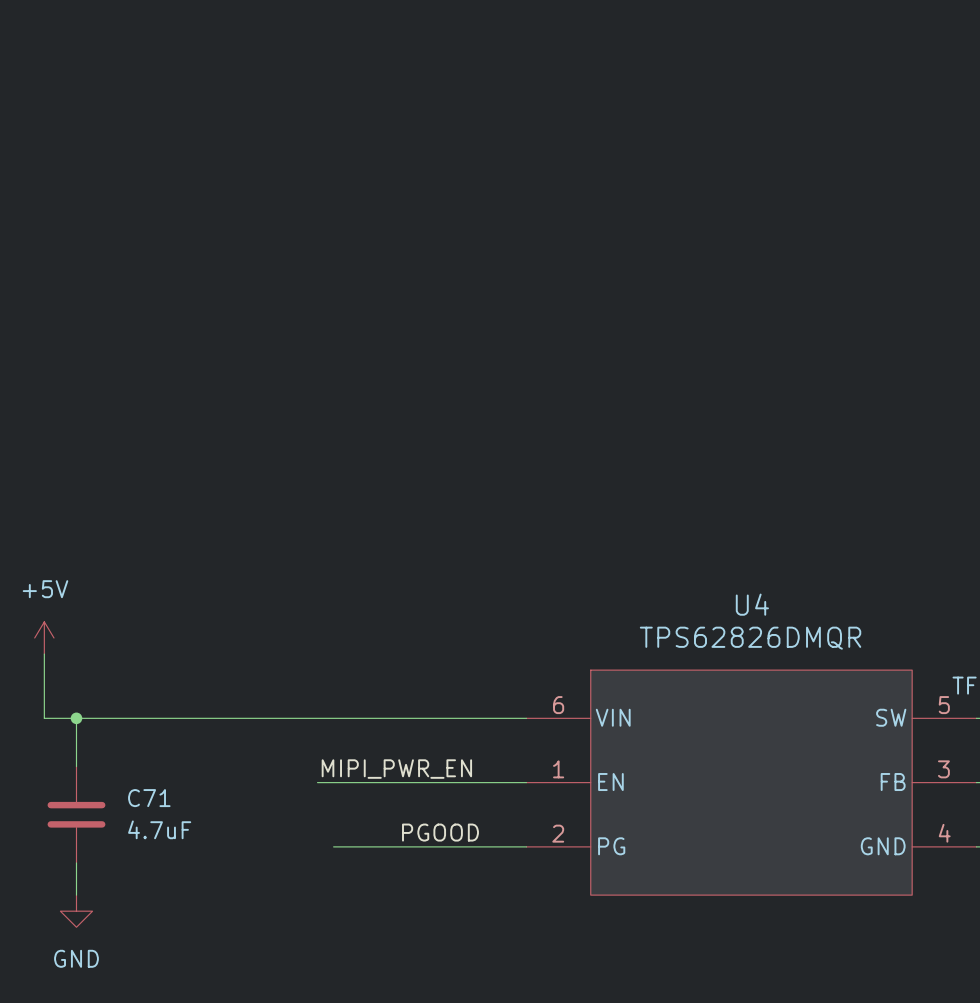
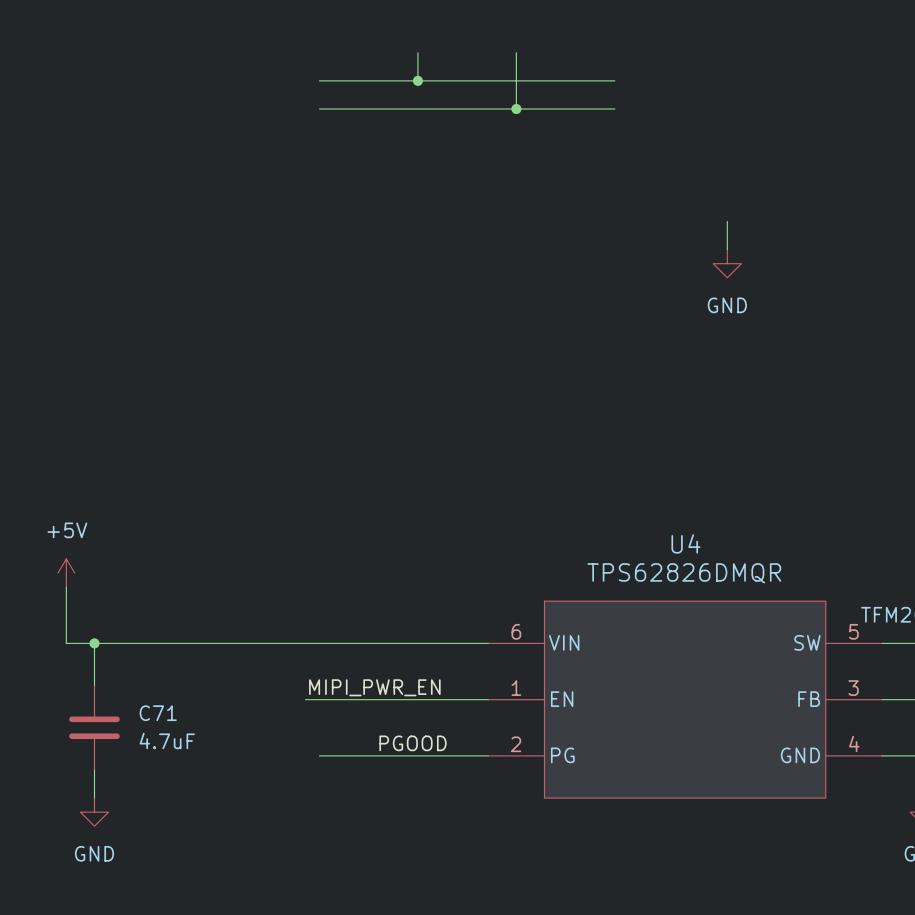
wire: none -> (417, 52) (417, 80)
wire: none -> (516, 52) (516, 109)
wire: none -> (319, 80) (614, 80)
junction: none -> (417, 80)
wire: none -> (319, 109) (614, 109)
junction: none -> (516, 109)
wire: none -> (727, 221) (727, 249)
power symbol: none -> GND (727, 263)

